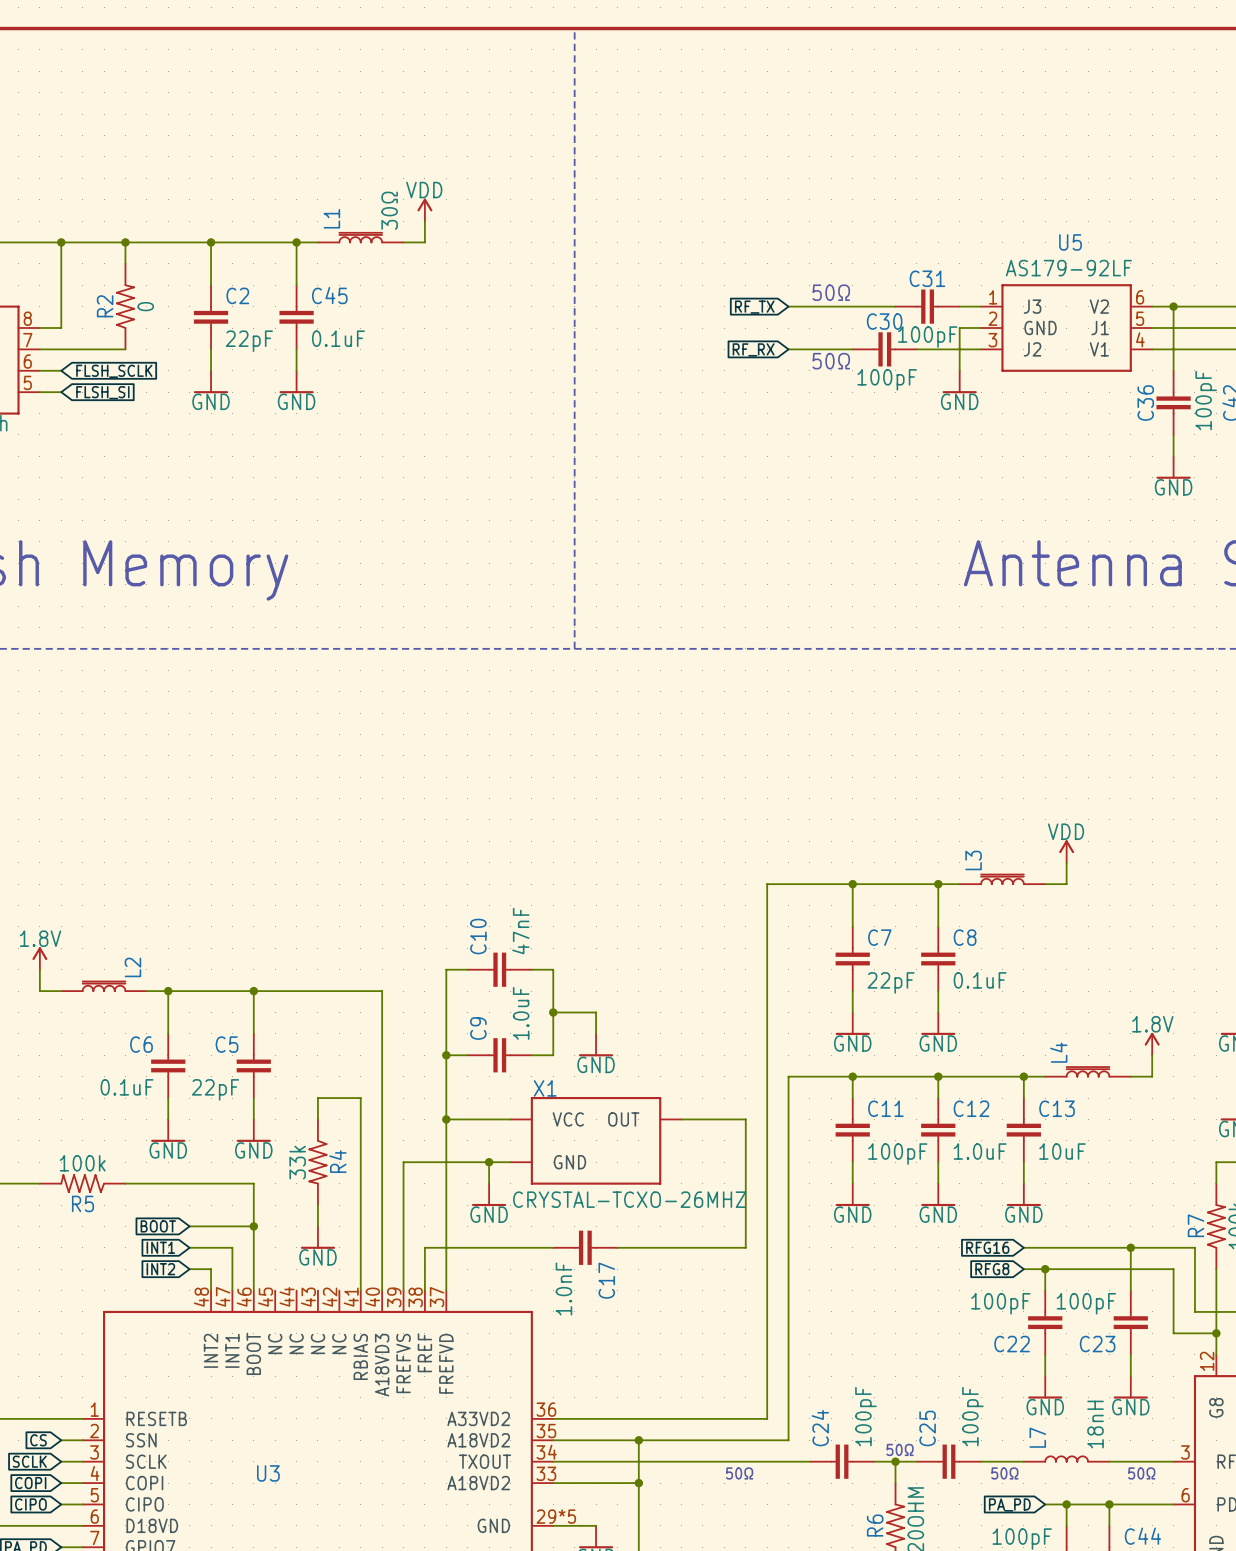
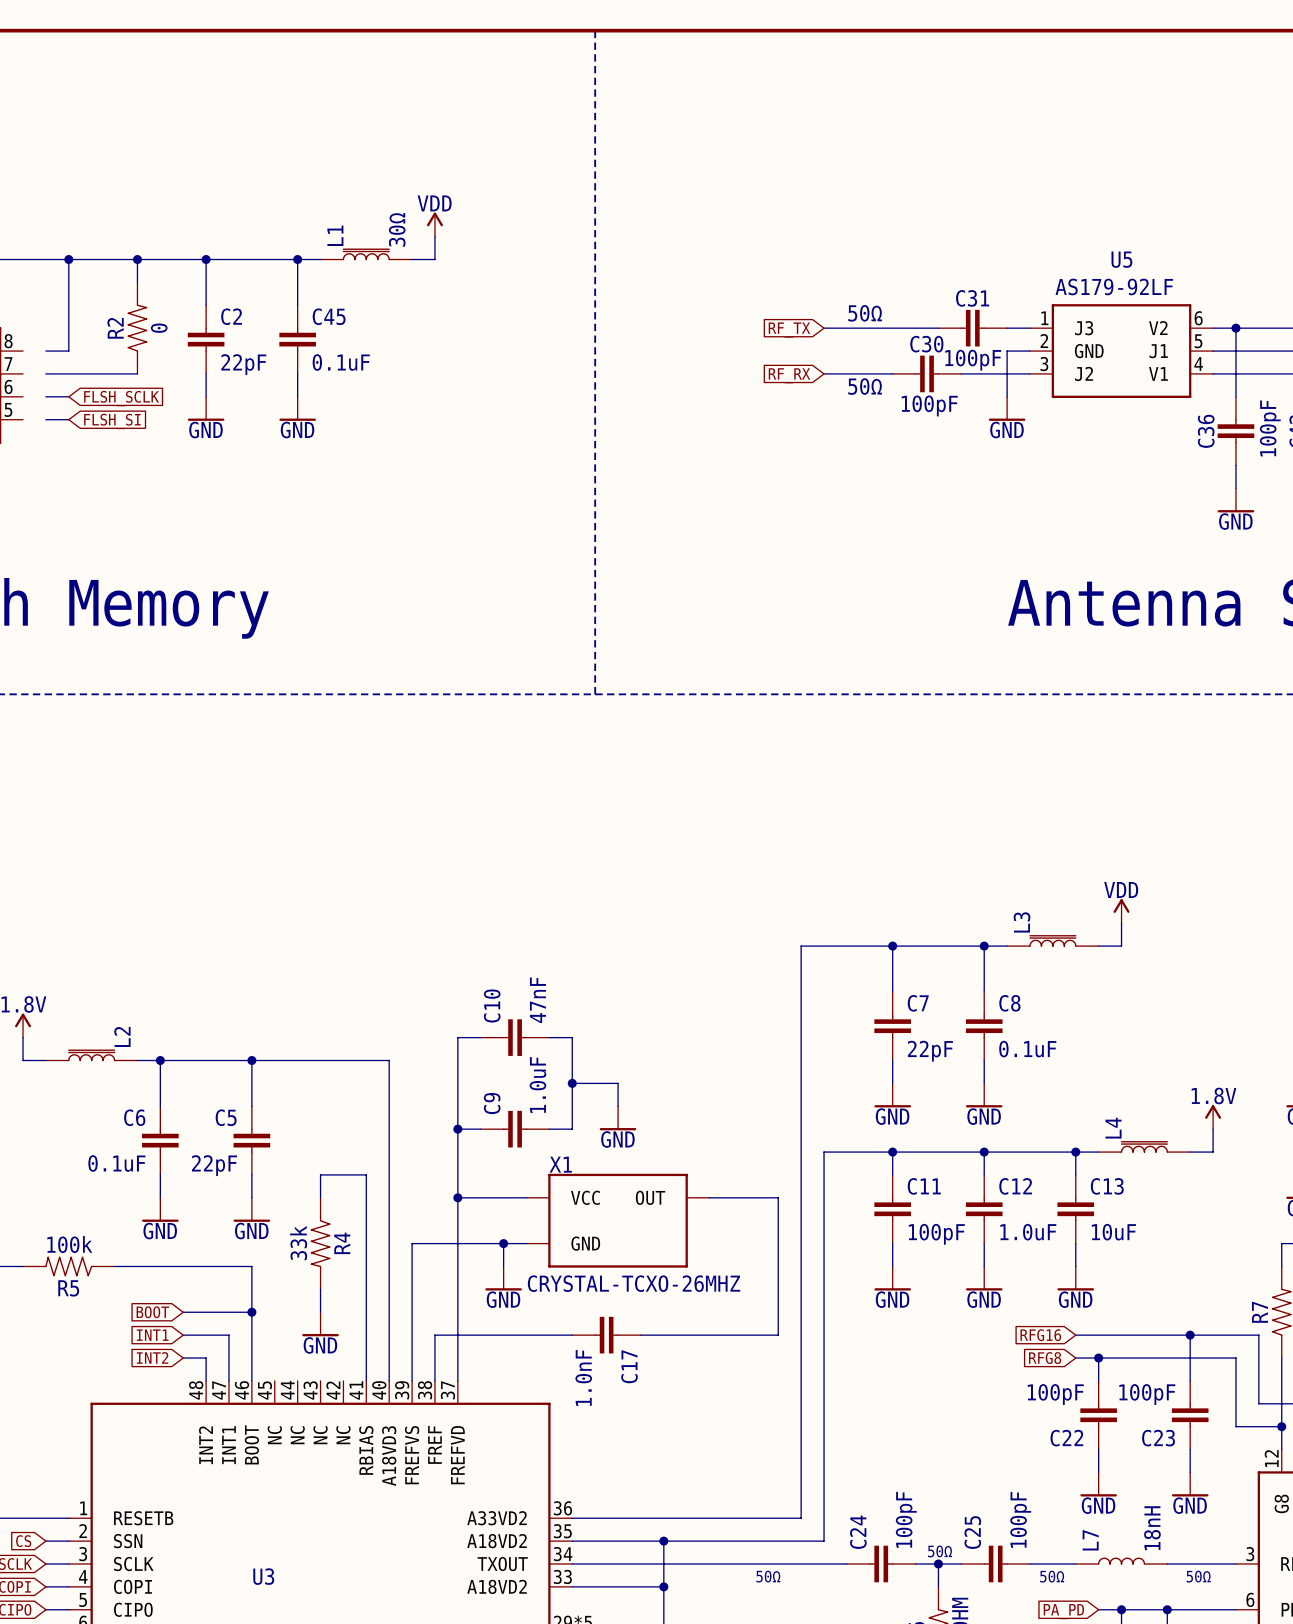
wire: (61, 242) (61, 328) (39, 328) -> (68, 259) (68, 351) (45, 351)
junction: (61, 242) -> none
junction: none -> (68, 259)
wire: (125, 242) (125, 263) -> (137, 259) (137, 282)
junction: (125, 242) -> none
junction: none -> (137, 259)
R2 position: (125, 306) -> (137, 328)
wire: (39, 349) (61, 349) -> (114, 373) (137, 373)
wire: (39, 370) (61, 370) -> (68, 396) (45, 396)
global label position: FLSH_SCLK (114, 371) -> FLSH_SCLK (121, 398)
wire: (39, 392) (61, 392) -> (68, 419) (45, 419)
global label position: FLSH_SI (102, 392) -> FLSH_SI (112, 421)

